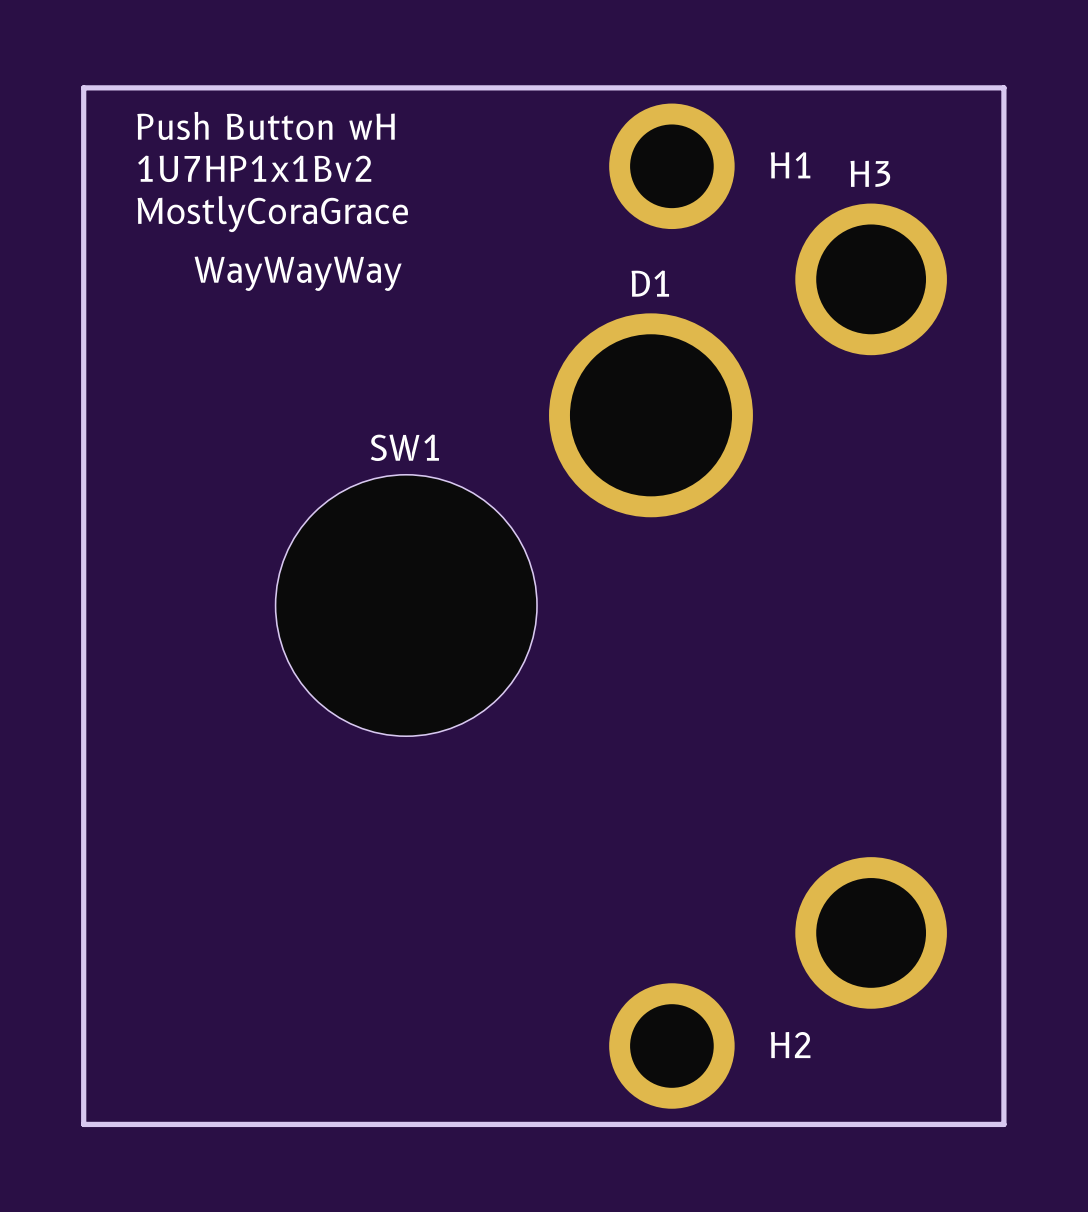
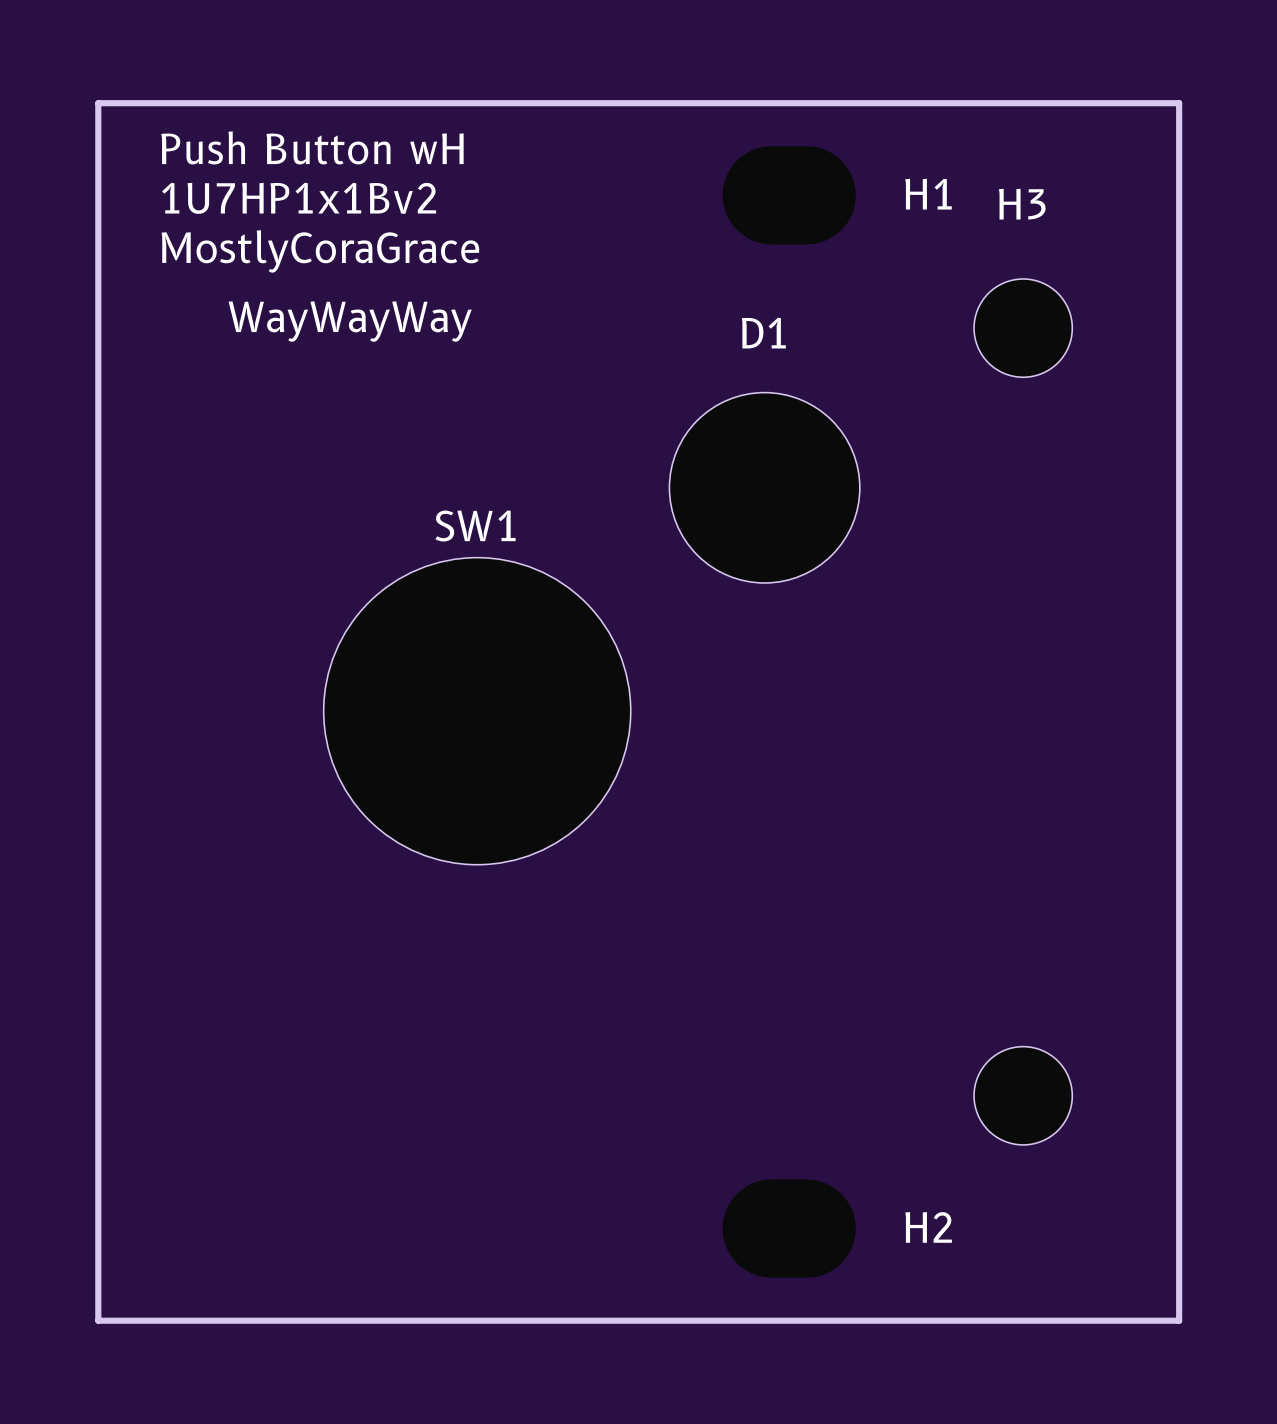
H1 footprint: [609, 103, 735, 230] -> [722, 146, 856, 245]
H3 footprint: [795, 203, 947, 1009] -> [974, 279, 1073, 1145]
D1 footprint: [549, 313, 753, 518] -> [669, 392, 860, 583]
H2 footprint: [609, 983, 735, 1109] -> [722, 1179, 856, 1278]

